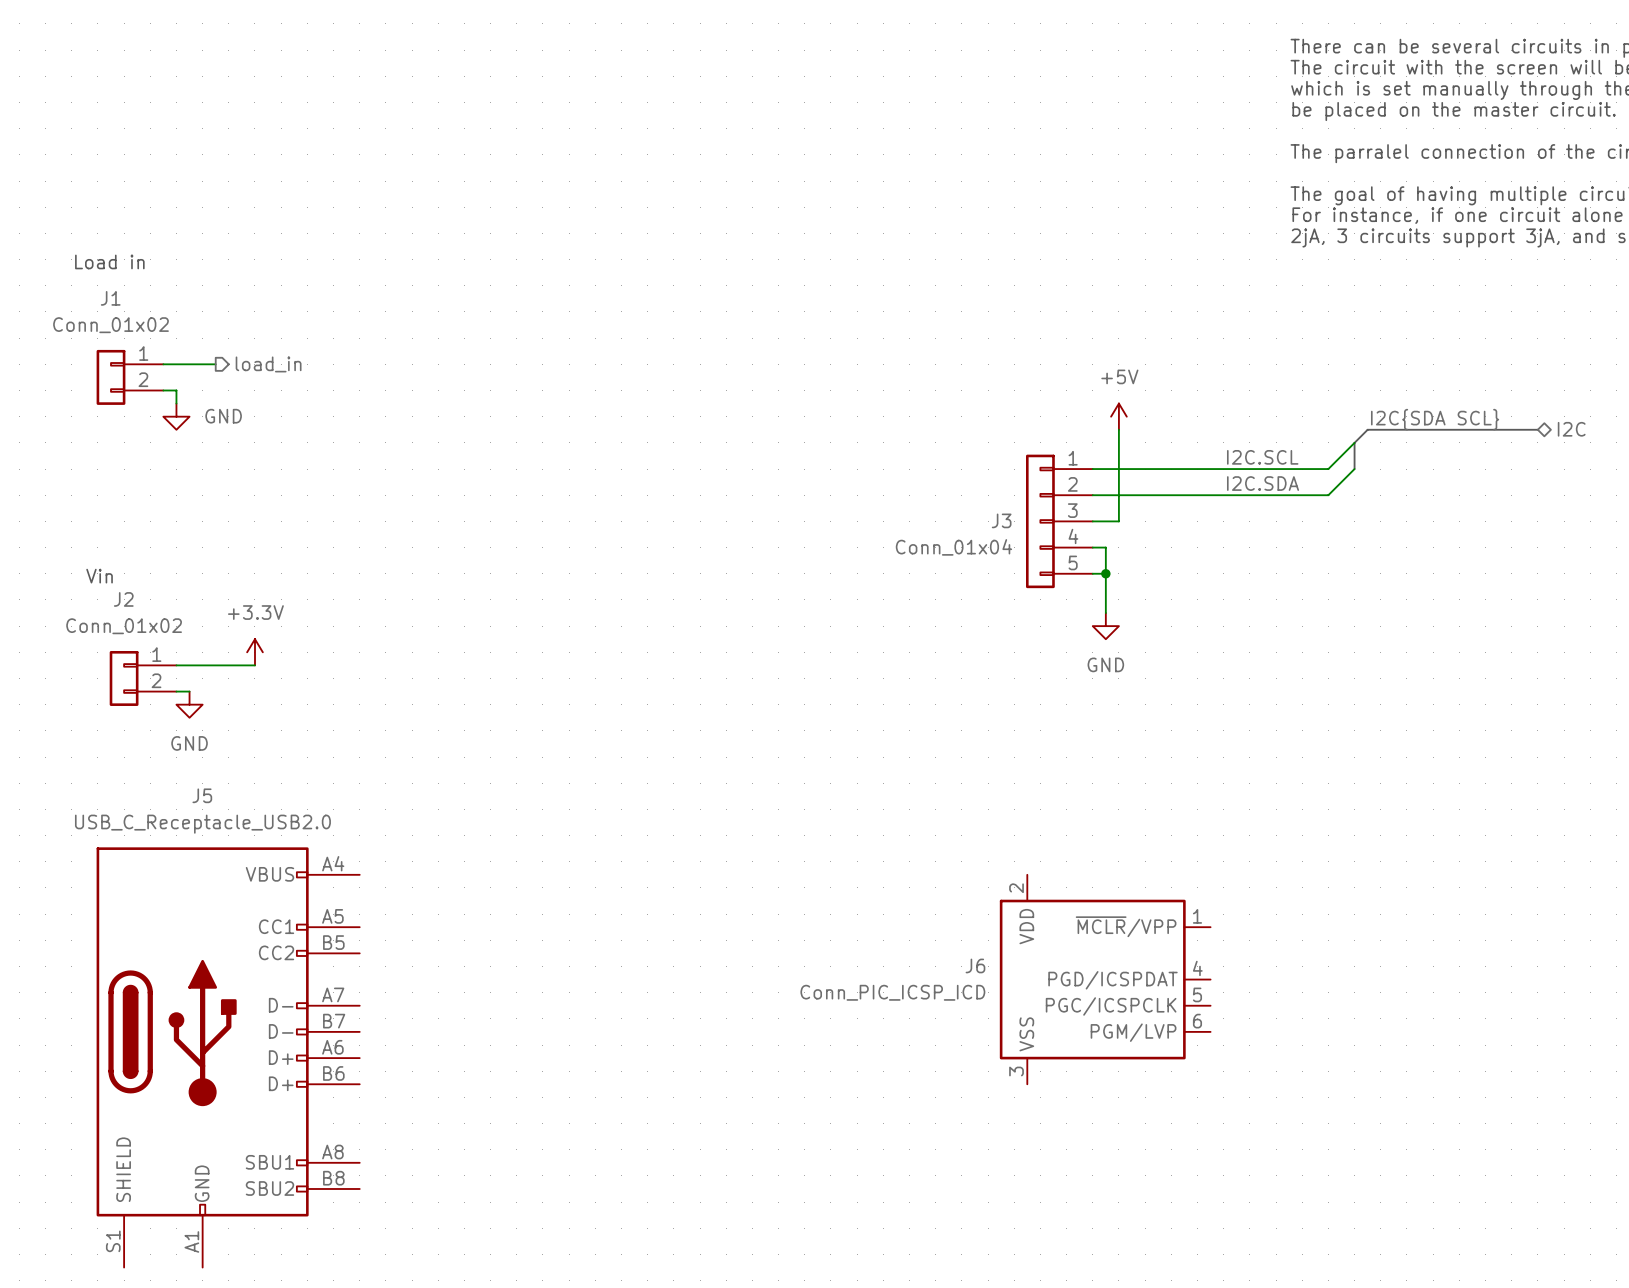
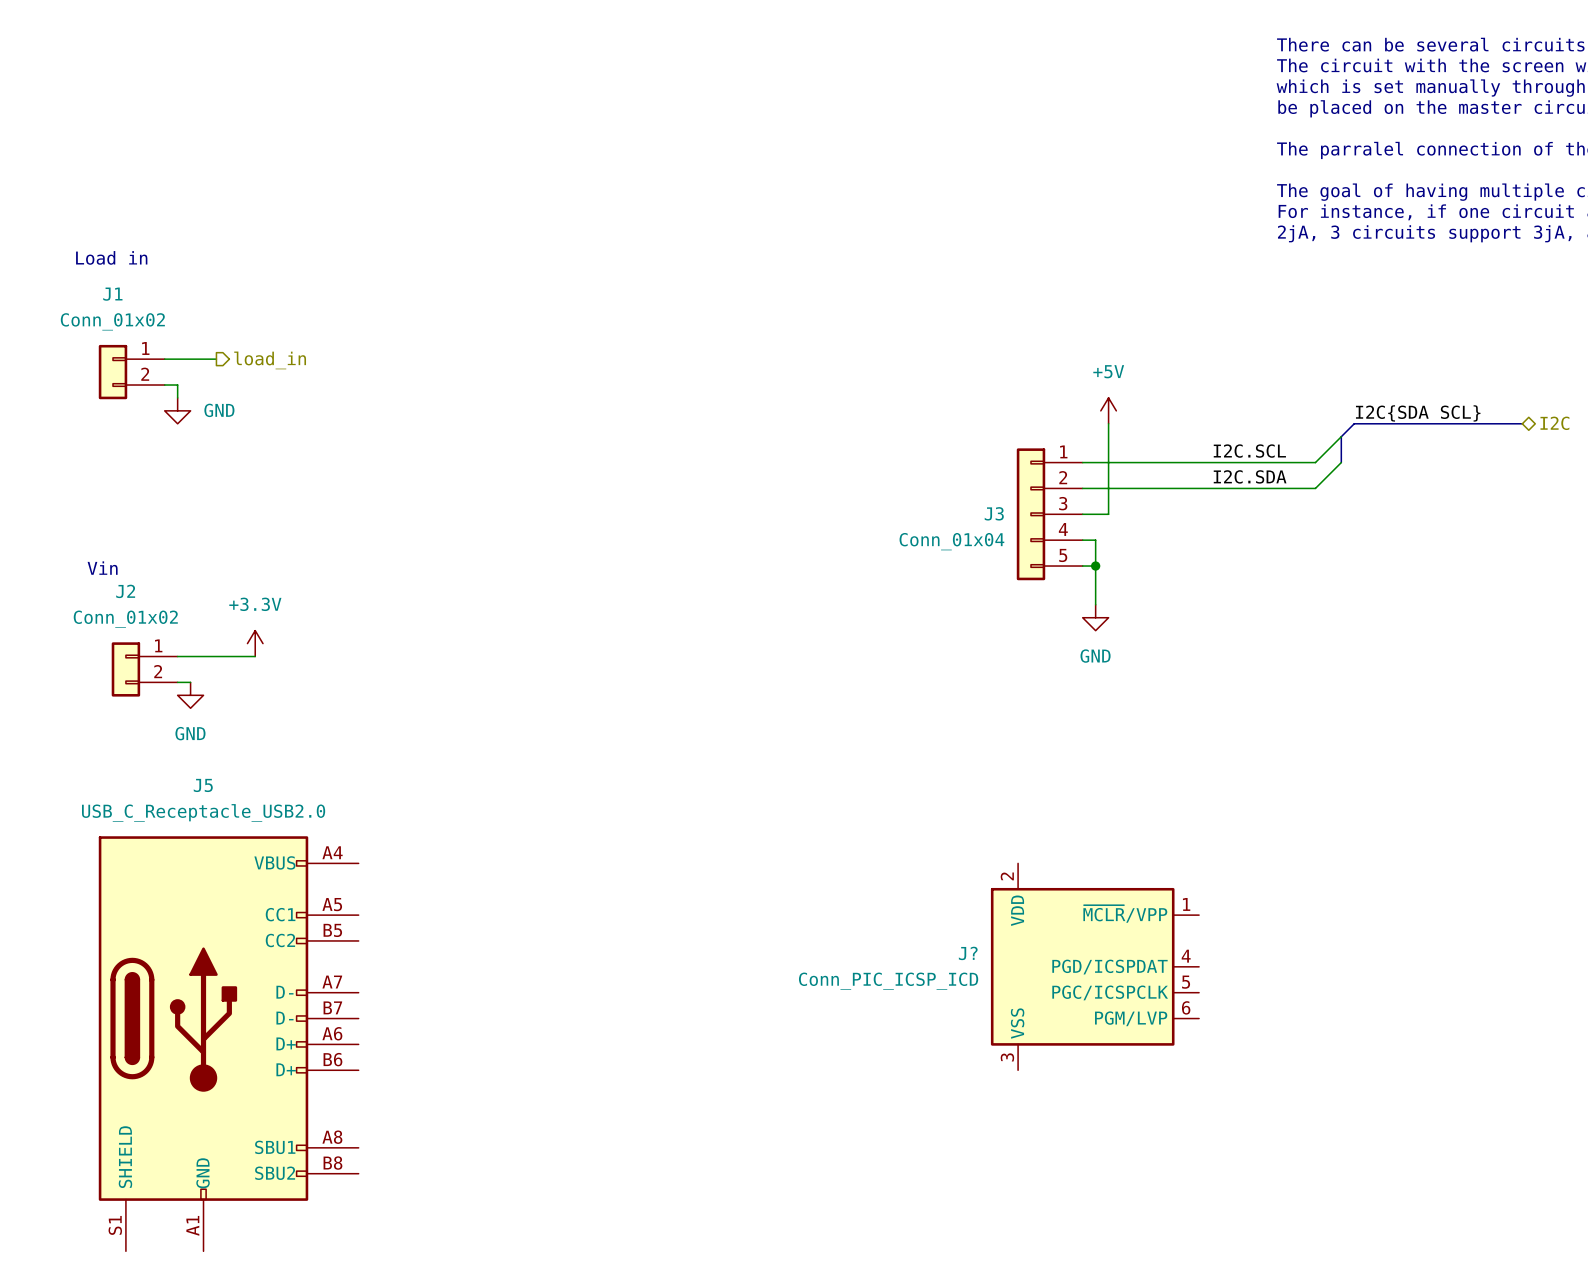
J6 name: J6 (975, 965) -> J? (968, 953)

